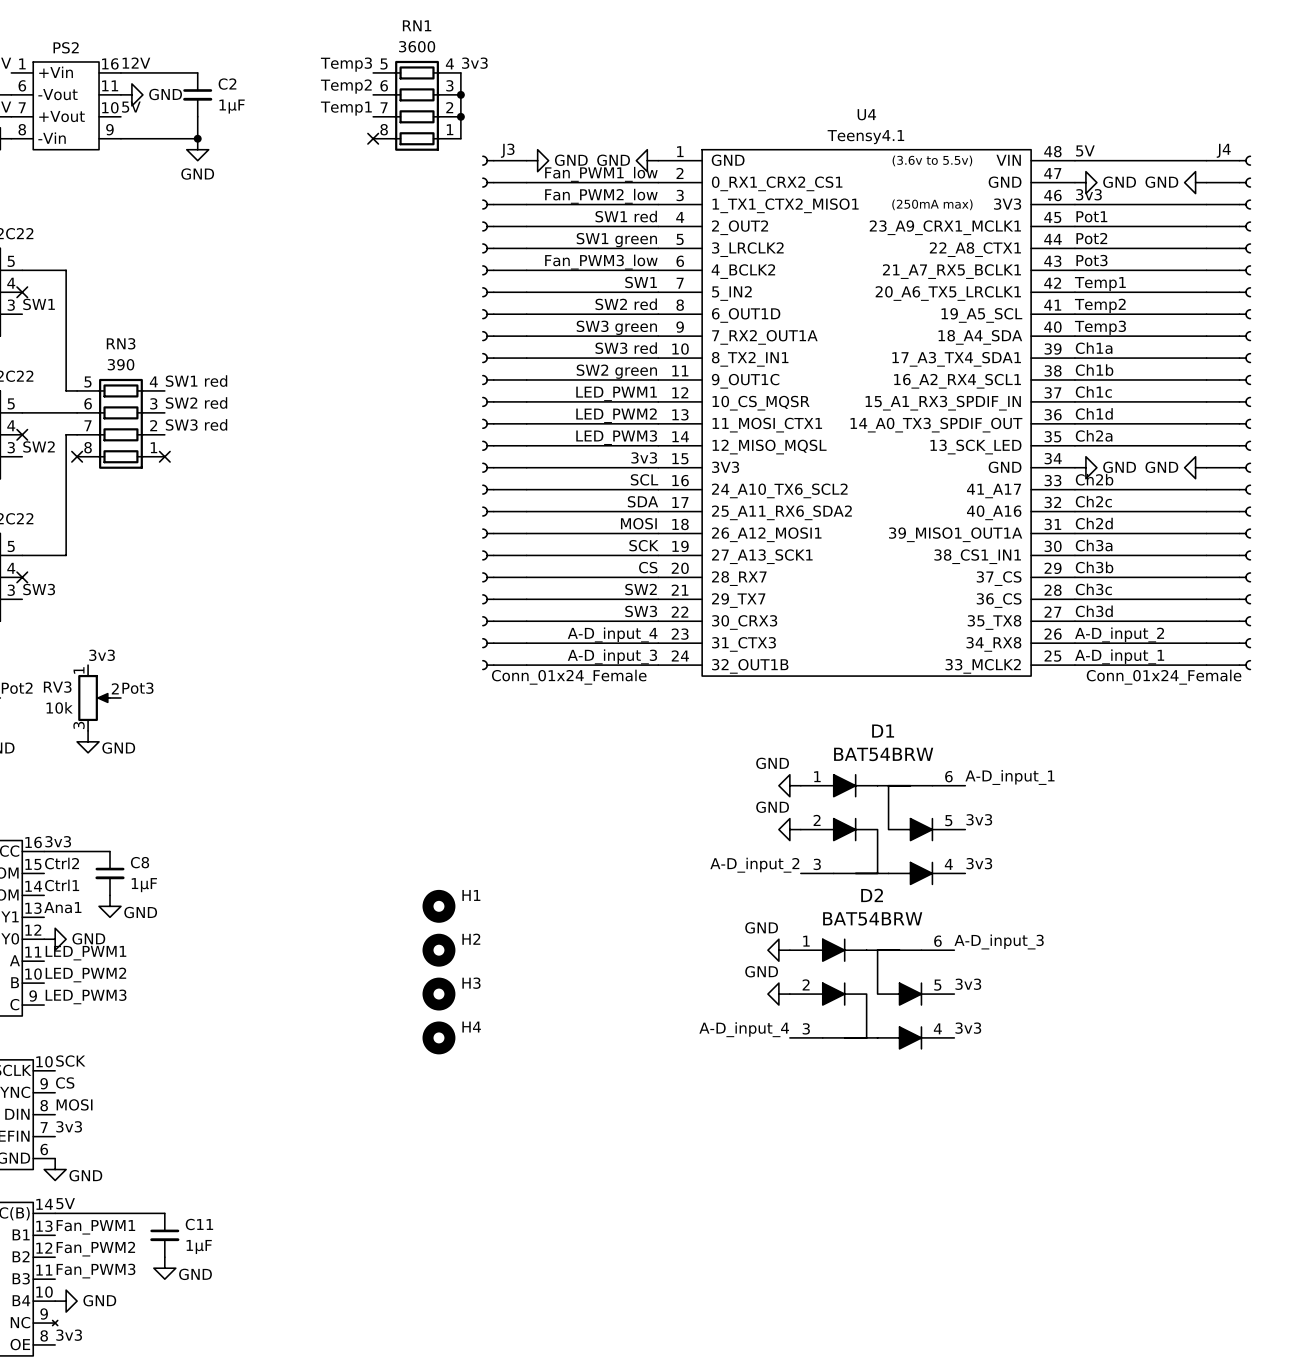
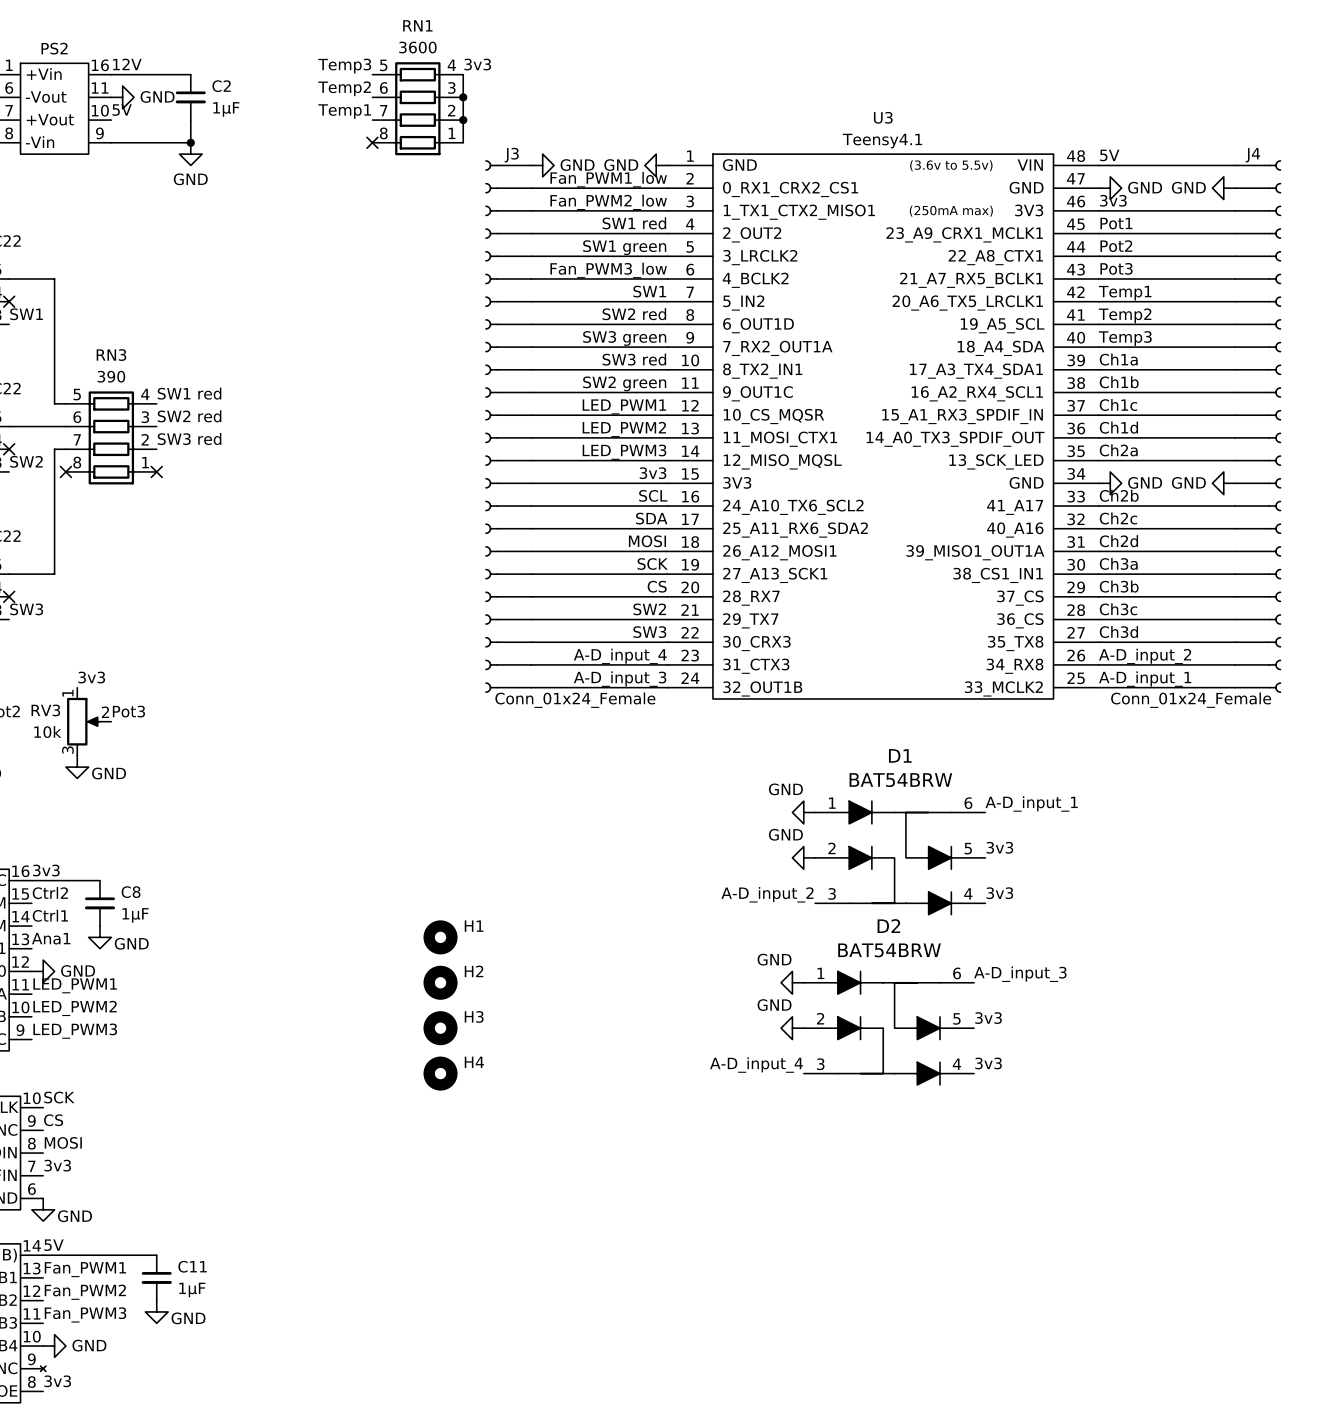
U4 name: U4 (866, 114) -> U3 (883, 117)

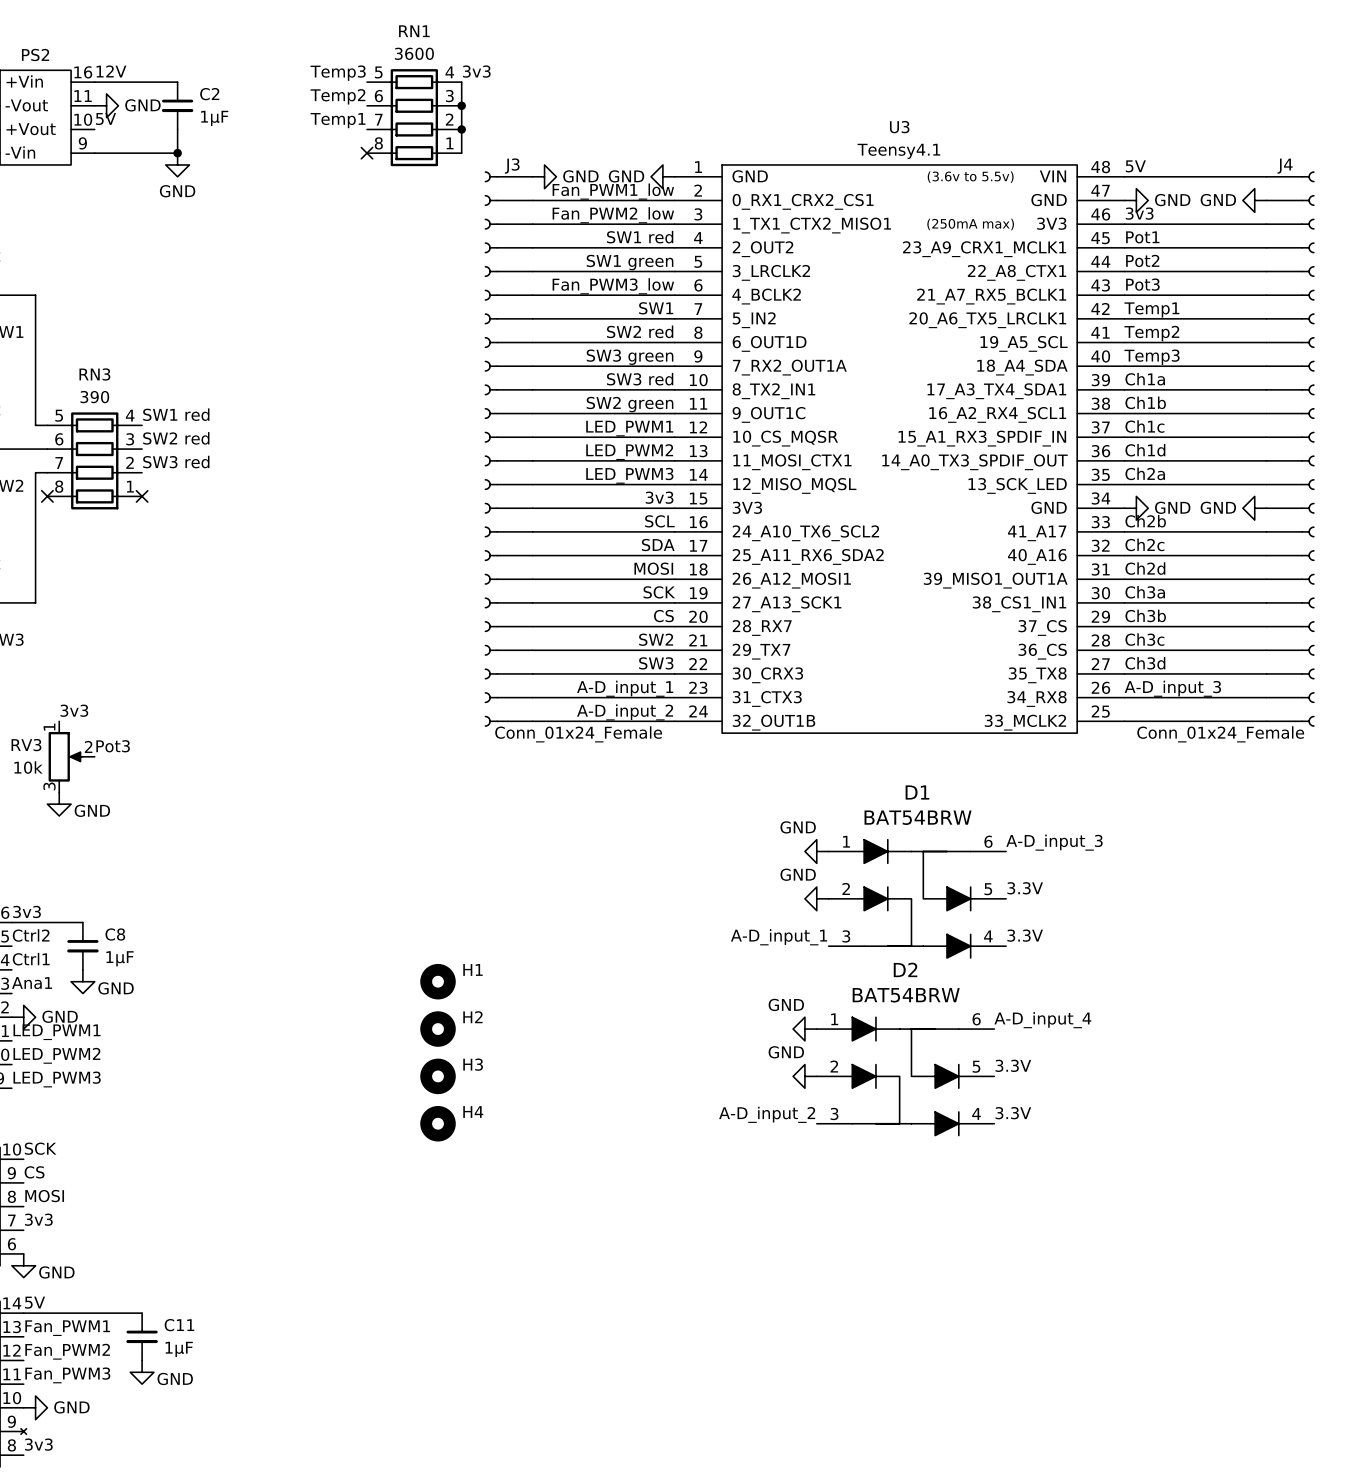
label: A-D_input_4 (620, 656) -> A-D_input_1 (625, 688)
label: A-D_input_2 (1145, 656) -> A-D_input_3 (1172, 688)
label: A-D_input_3 (620, 679) -> A-D_input_2 (625, 712)
label: A-D_input_1 (1145, 679) -> none
label: A-D_input_1 (1031, 803) -> A-D_input_3 (1054, 842)
label: 3v3 (999, 847) -> 3.3V (1025, 888)
label: 3v3 (999, 893) -> 3.3V (1025, 935)
label: A-D_input_2 (767, 894) -> A-D_input_1 (779, 937)
label: A-D_input_3 (1020, 974) -> A-D_input_4 (1042, 1020)
label: 3v3 (988, 1018) -> 3.3V (1013, 1065)
label: 3v3 (988, 1063) -> 3.3V (1013, 1113)
label: A-D_input_4 (756, 1065) -> A-D_input_2 (767, 1114)

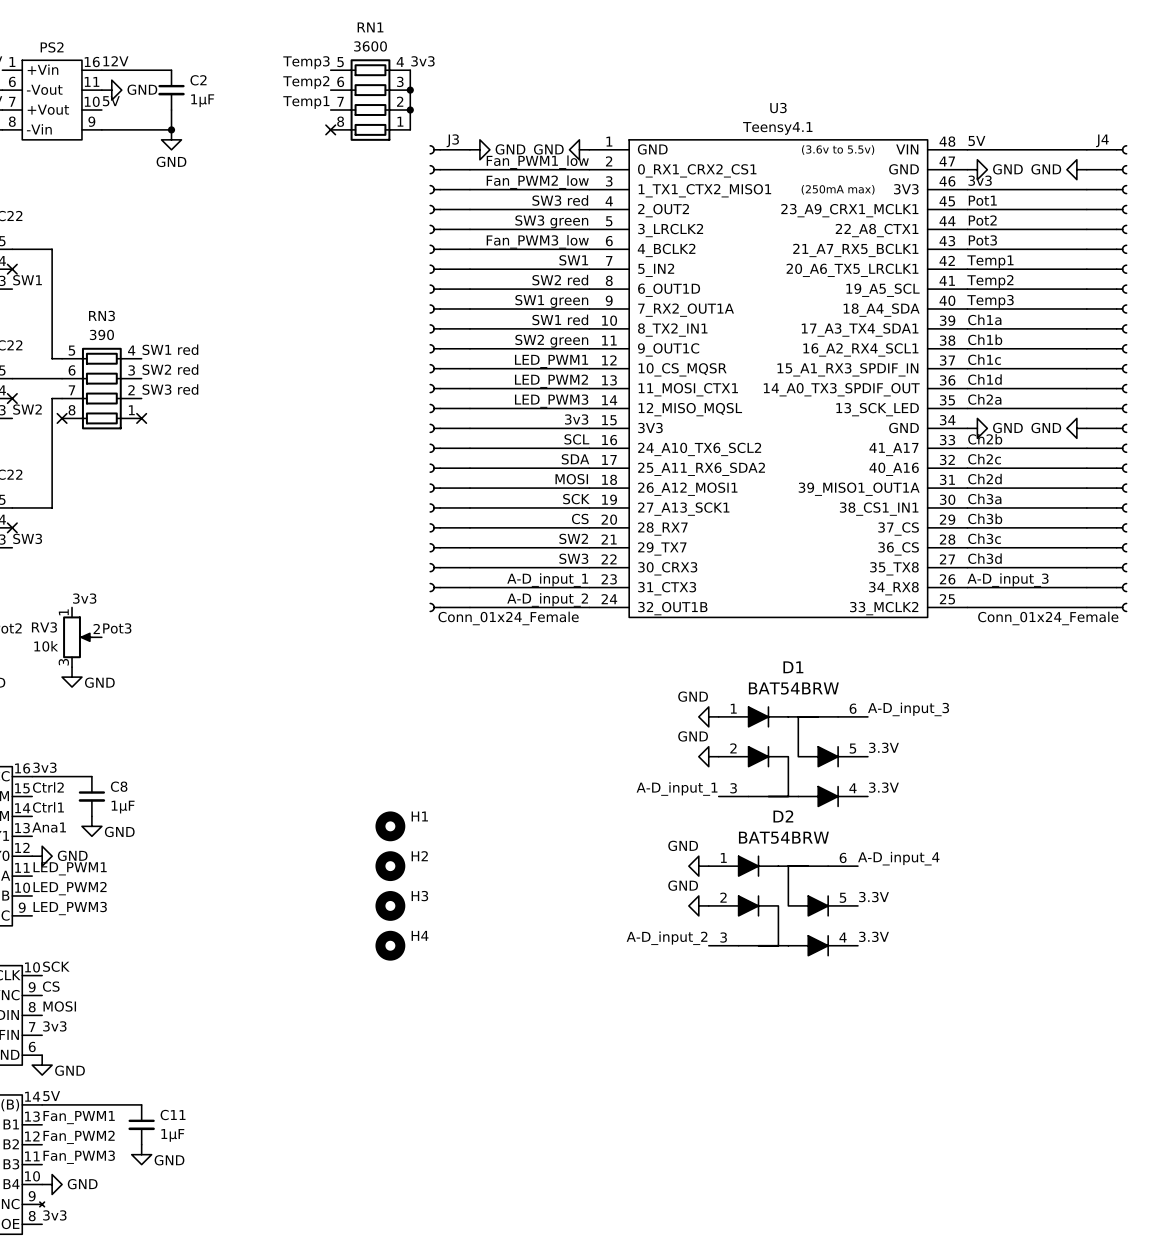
label: SW1 red (640, 237) -> SW3 red (560, 200)
label: SW1 green (630, 262) -> SW3 green (551, 221)
label: SW3 green (630, 357) -> SW1 green (551, 301)
label: SW3 red (640, 379) -> SW1 red (560, 319)

